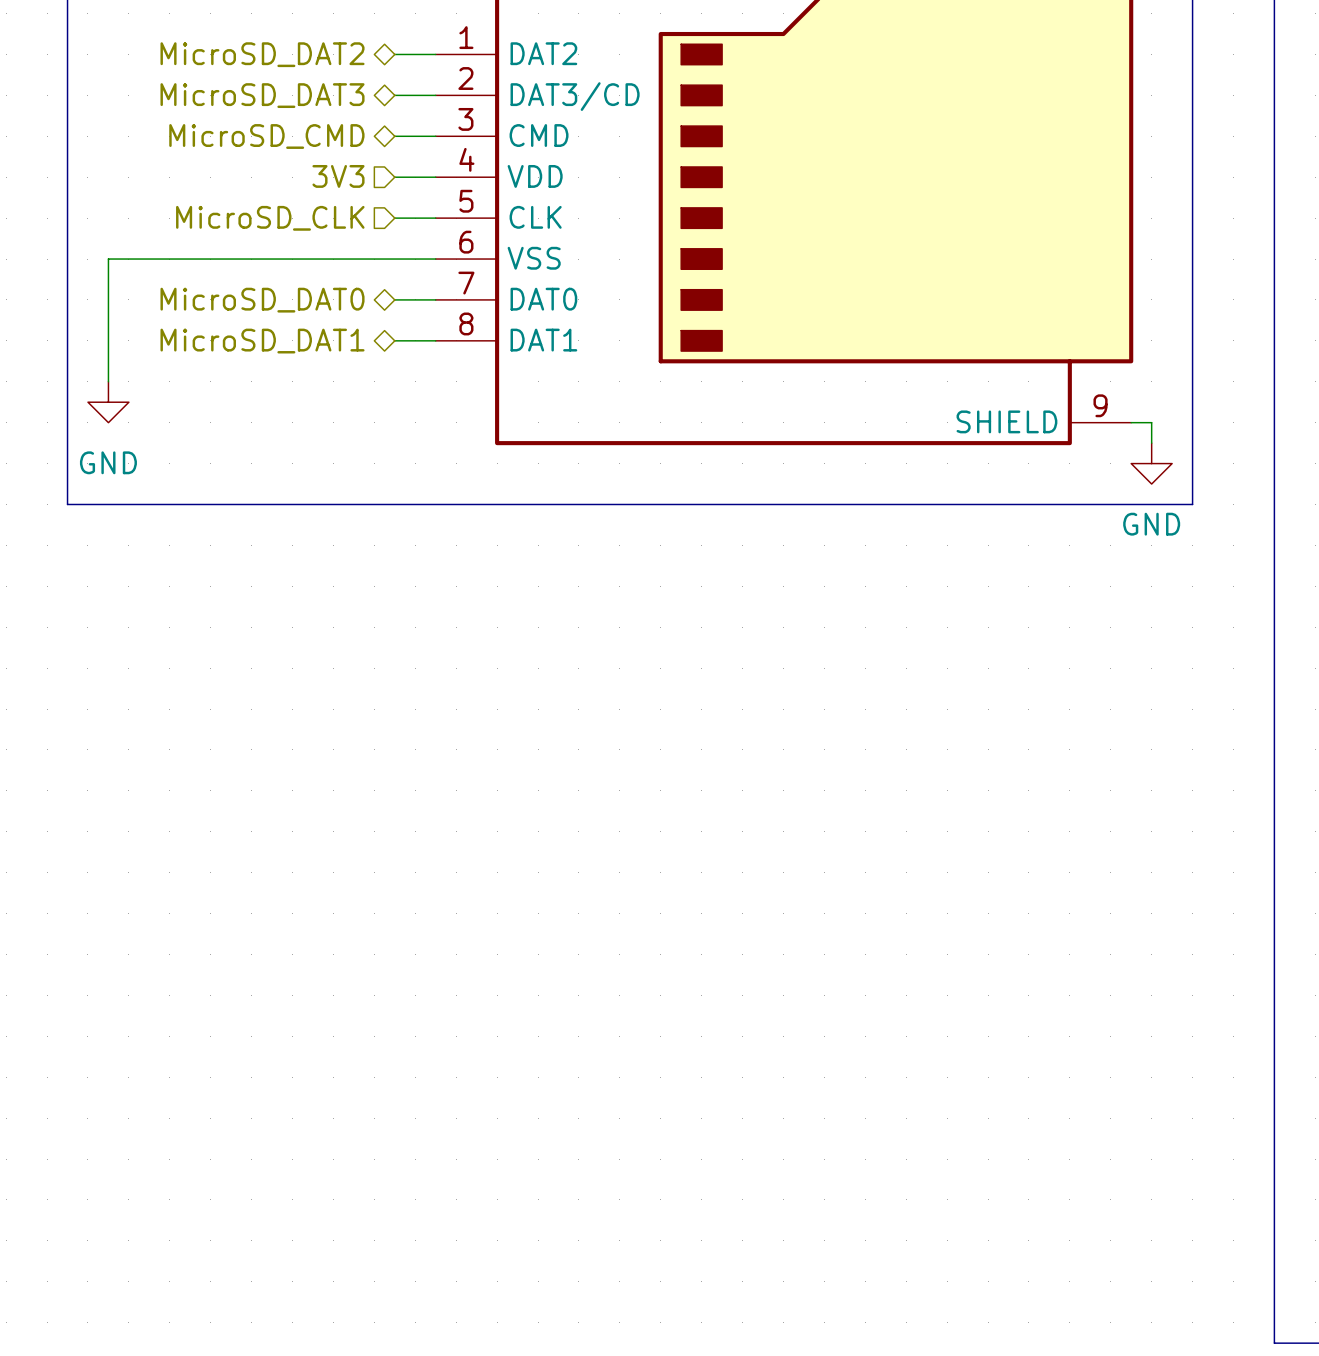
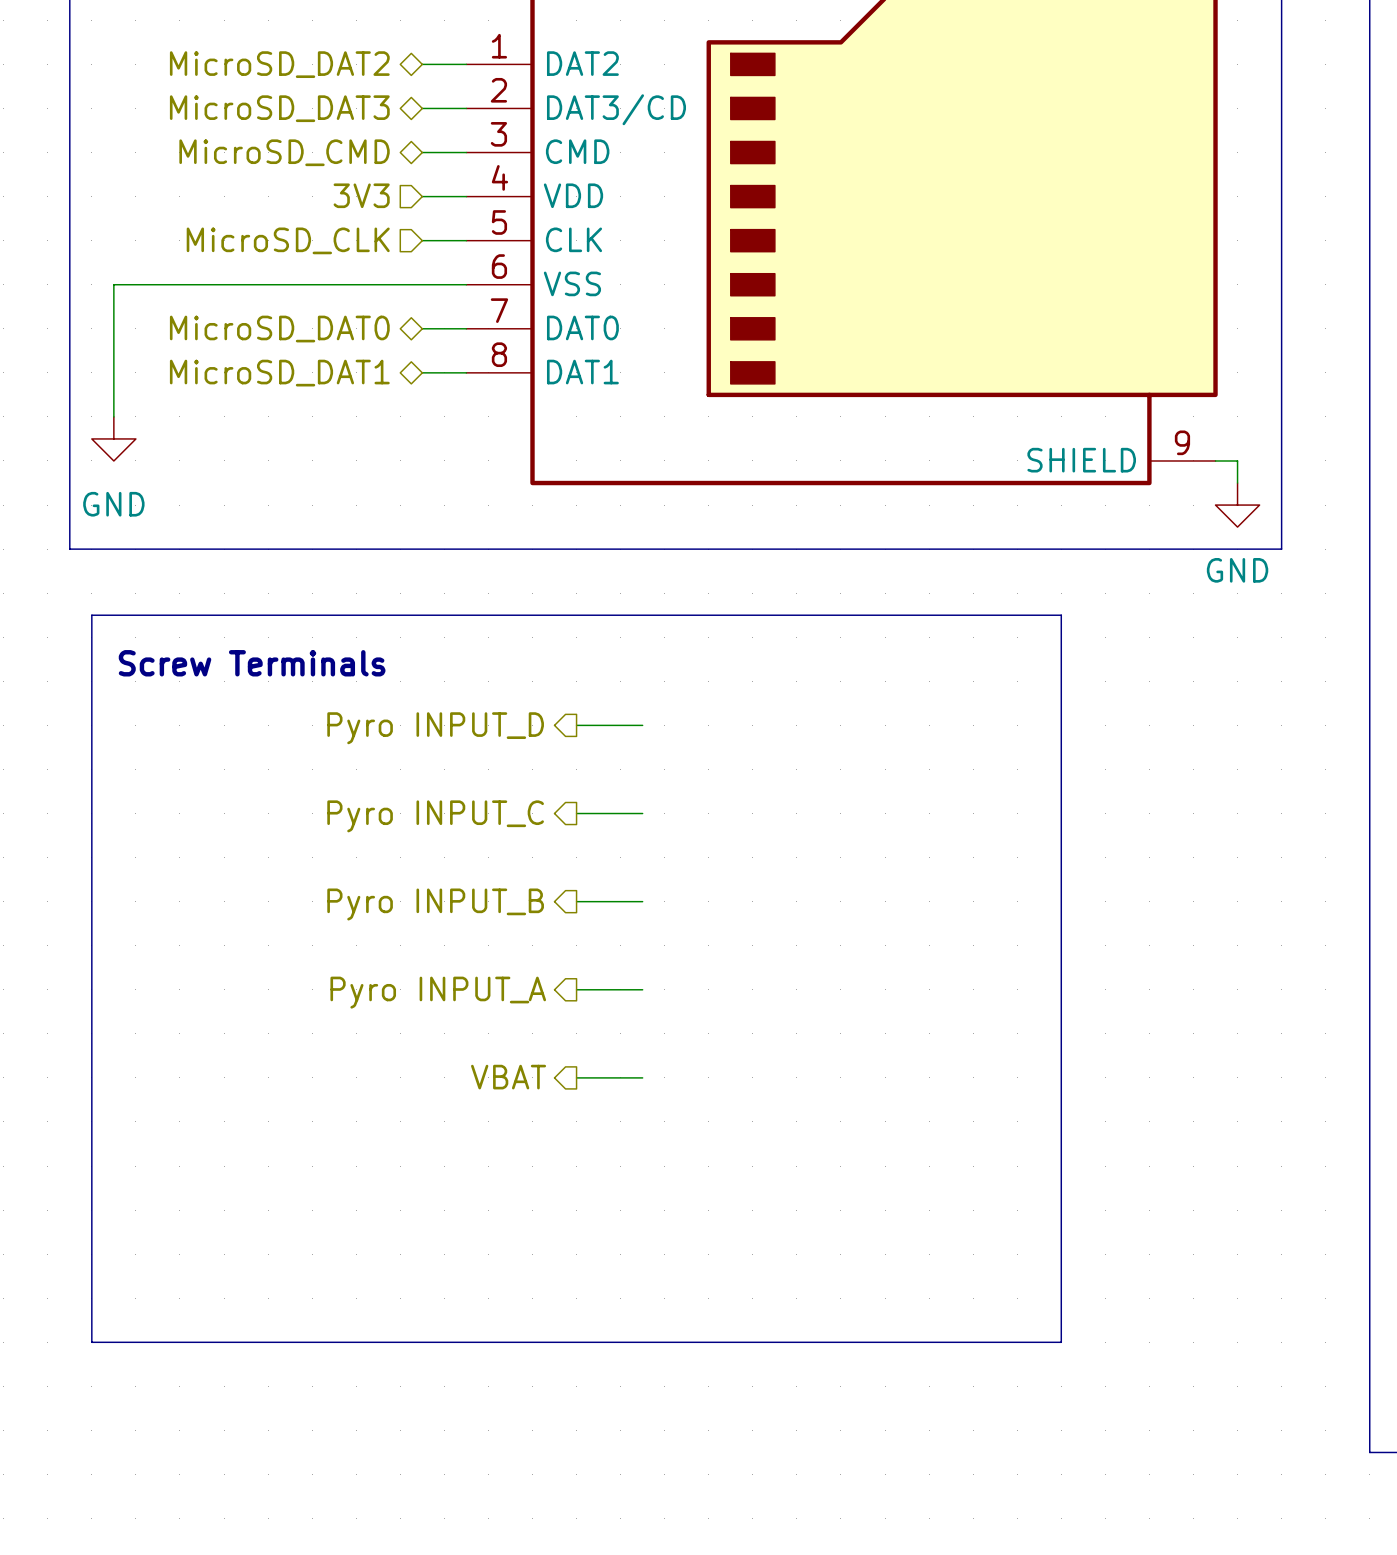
line: none -> (91, 615) (1061, 615) (1061, 1342) (91, 1342) (91, 615)
text: none -> Screw Terminals (252, 663)
wire: none -> (576, 725) (642, 725)
hierarchical label: none -> Pyro INPUT_D (435, 728)
wire: none -> (576, 813) (642, 813)
hierarchical label: none -> Pyro INPUT_C (435, 816)
wire: none -> (576, 901) (642, 901)
hierarchical label: none -> Pyro INPUT_B (435, 904)
wire: none -> (576, 989) (642, 989)
hierarchical label: none -> Pyro INPUT_A (438, 992)
hierarchical label: none -> VBAT (508, 1077)
wire: none -> (576, 1077) (642, 1077)

